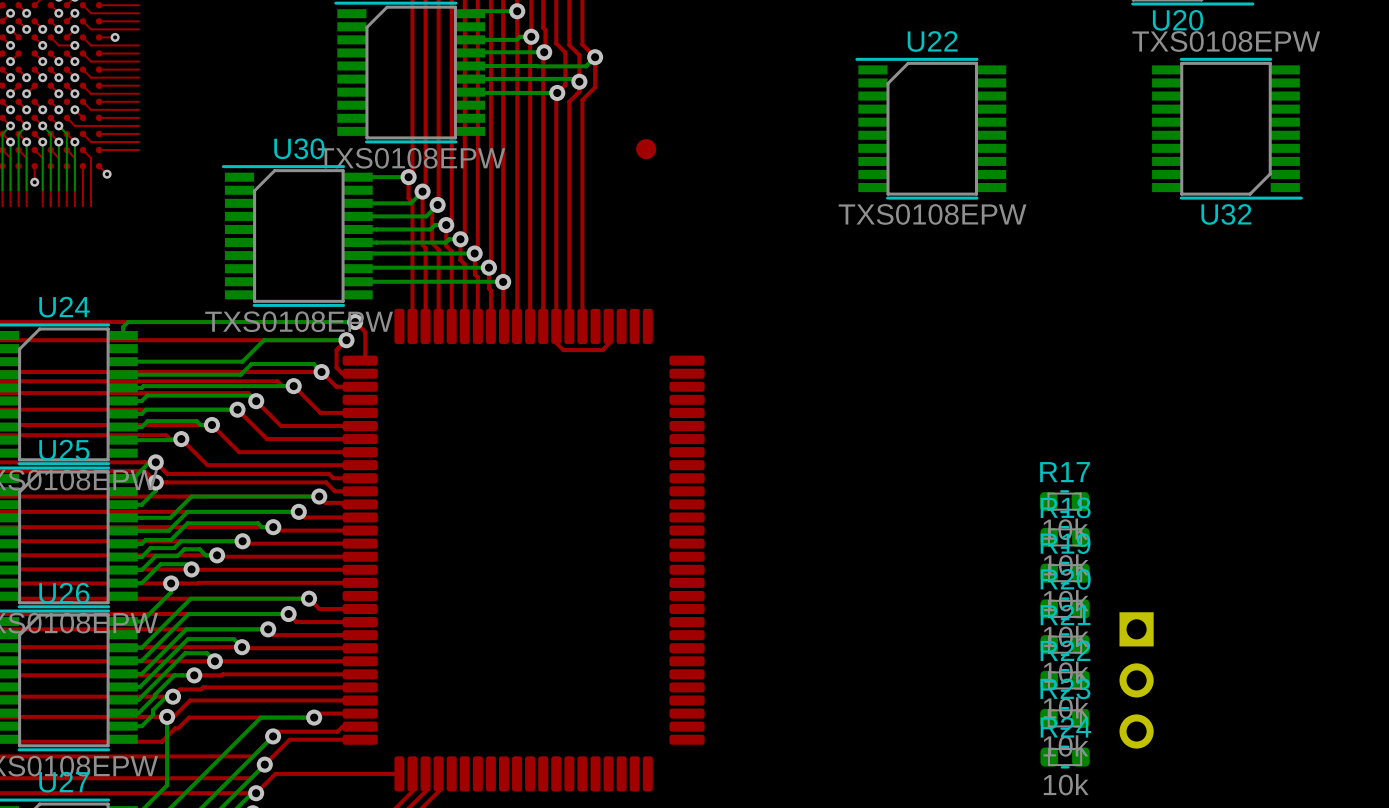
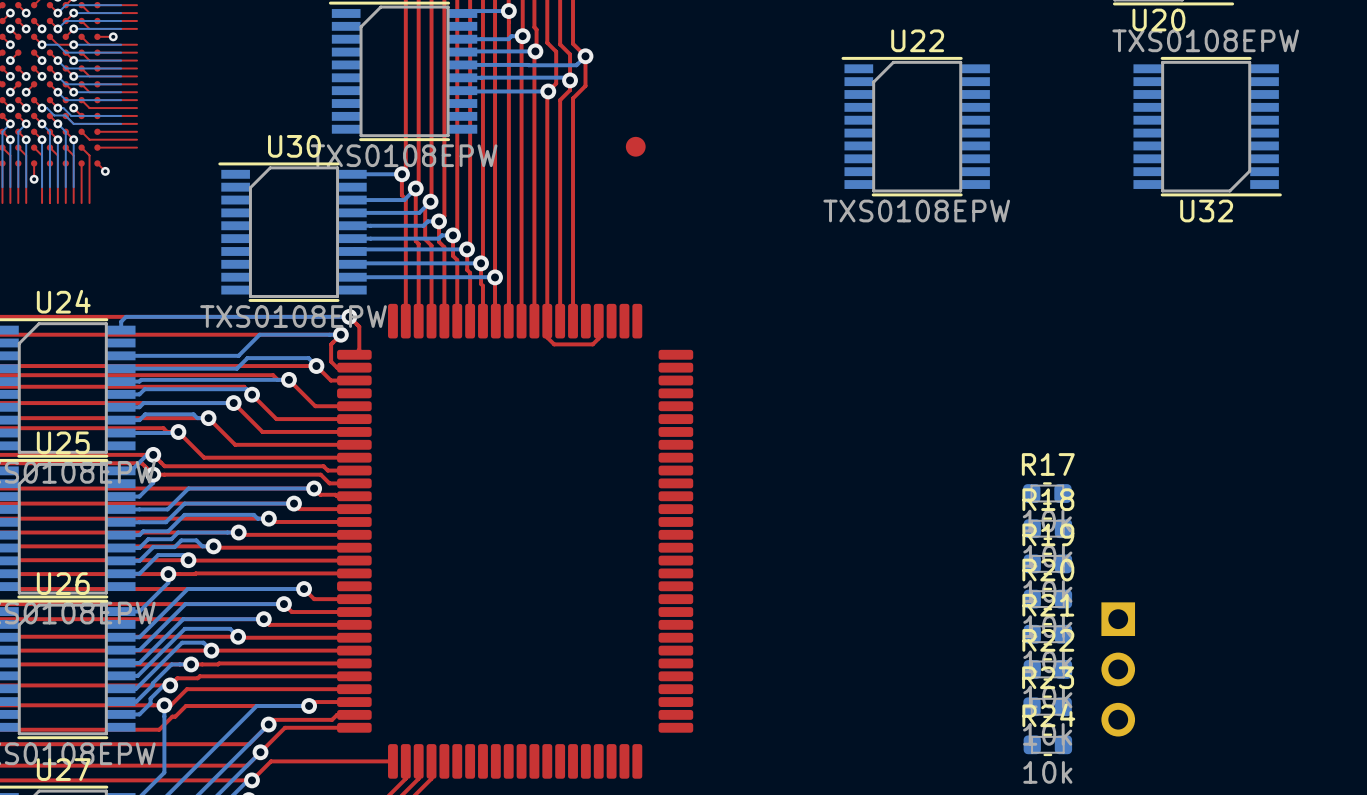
bottom track: none -> (121, 5) (65, 5) (57, 13)
bottom track: none -> (121, 13) (73, 13)
bottom track: none -> (121, 20) (65, 20) (57, 28)
bottom track: none -> (121, 28) (73, 28)
bottom track: none -> (42, 44) (57, 44) (65, 52) (121, 52)
bottom track: none -> (121, 44) (73, 44)
bottom track: none -> (57, 60) (65, 68) (121, 68)
bottom track: none -> (121, 60) (73, 60)
bottom track: none -> (57, 76) (65, 84) (121, 84)
bottom track: none -> (121, 76) (73, 76)
bottom track: none -> (57, 92) (65, 100) (121, 100)
bottom track: none -> (121, 92) (73, 92)
bottom track: none -> (42, 108) (46, 108) (54, 115) (65, 115) (73, 123) (121, 123)
bottom track: none -> (57, 108) (63, 108) (71, 115) (121, 115)

